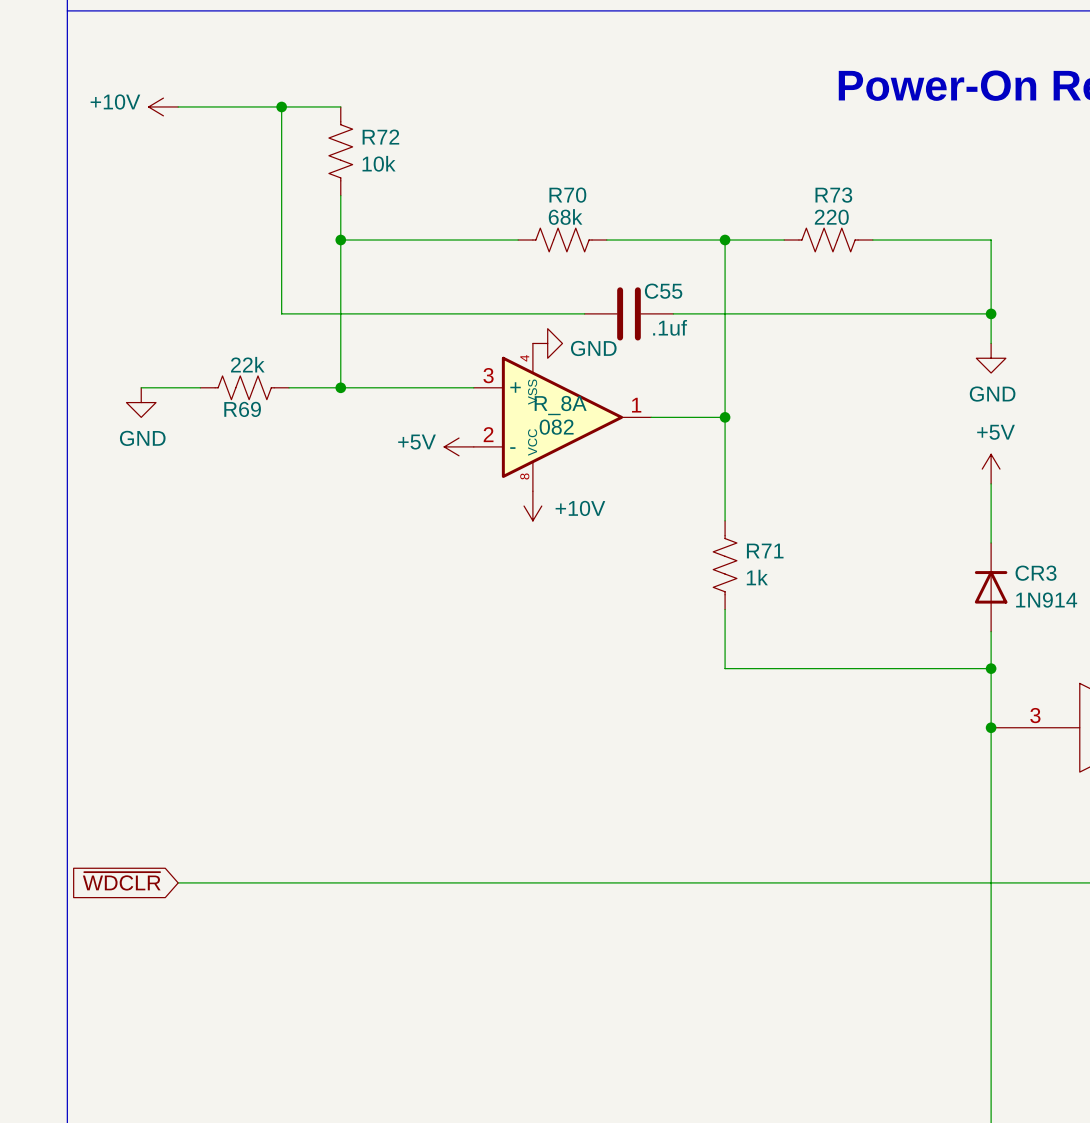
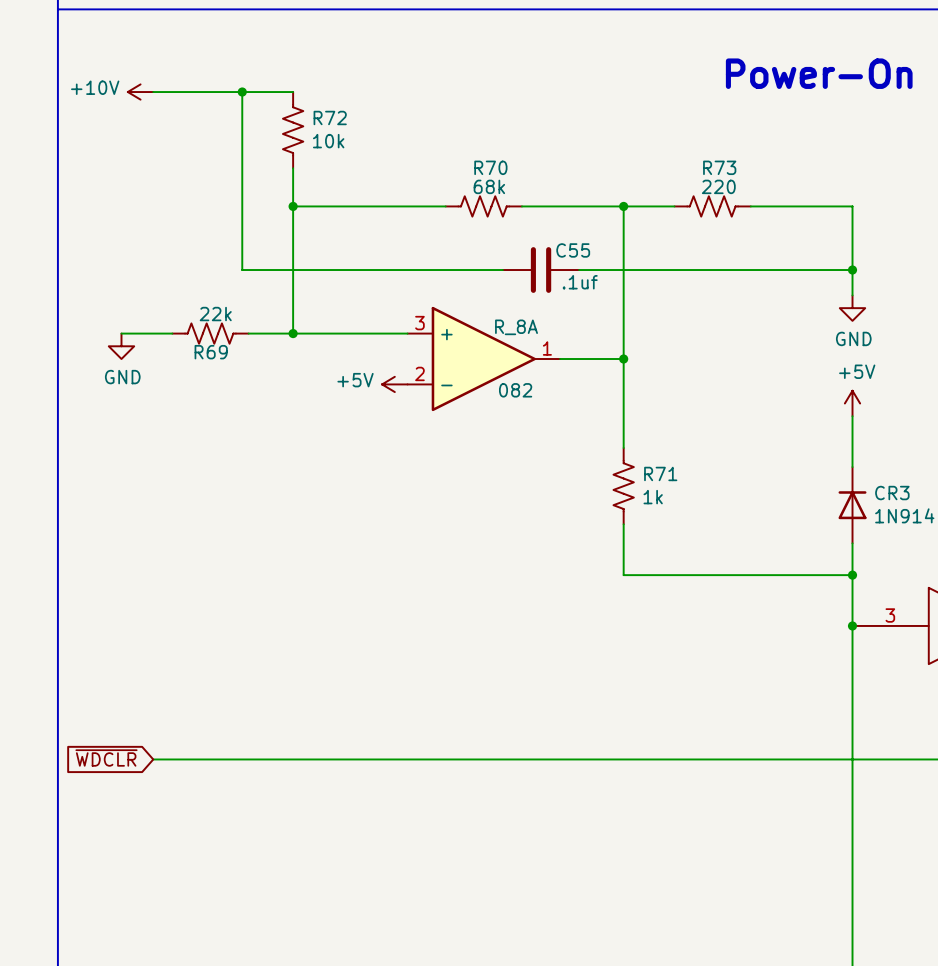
R_8A symbol: [473, 343, 652, 492] -> [407, 306, 561, 412]
power symbol: GND (547, 343) -> none
R_8A name position: R_8A (560, 405) -> R_8A (516, 327)
R_8A value position: 082 (556, 427) -> 082 (515, 390)
power symbol: +10V (532, 506) -> none

